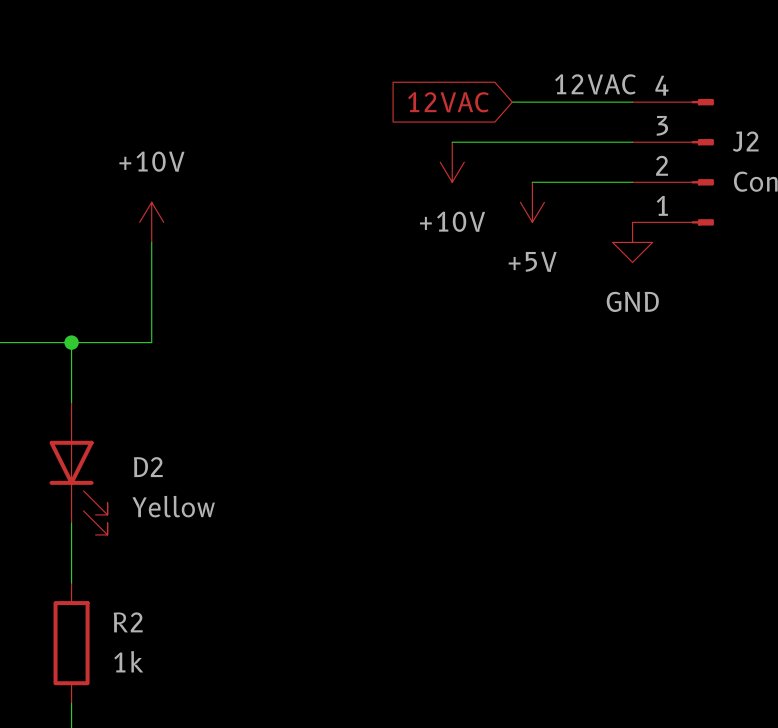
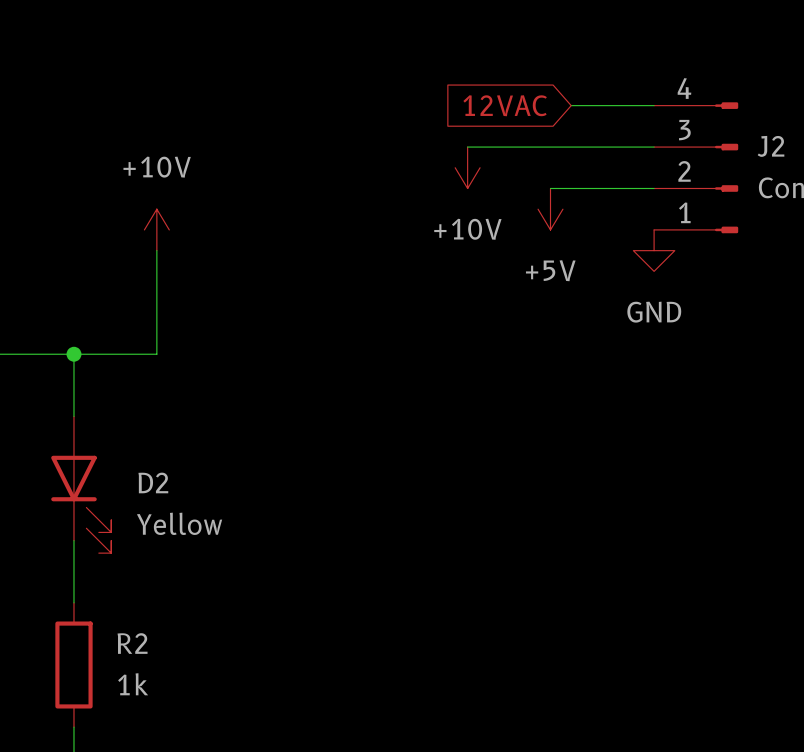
label: 12VAC (595, 84) -> none
global label position: 12VAC (448, 102) -> 12VAC (505, 105)
wire: (512, 102) (552, 102) -> none

